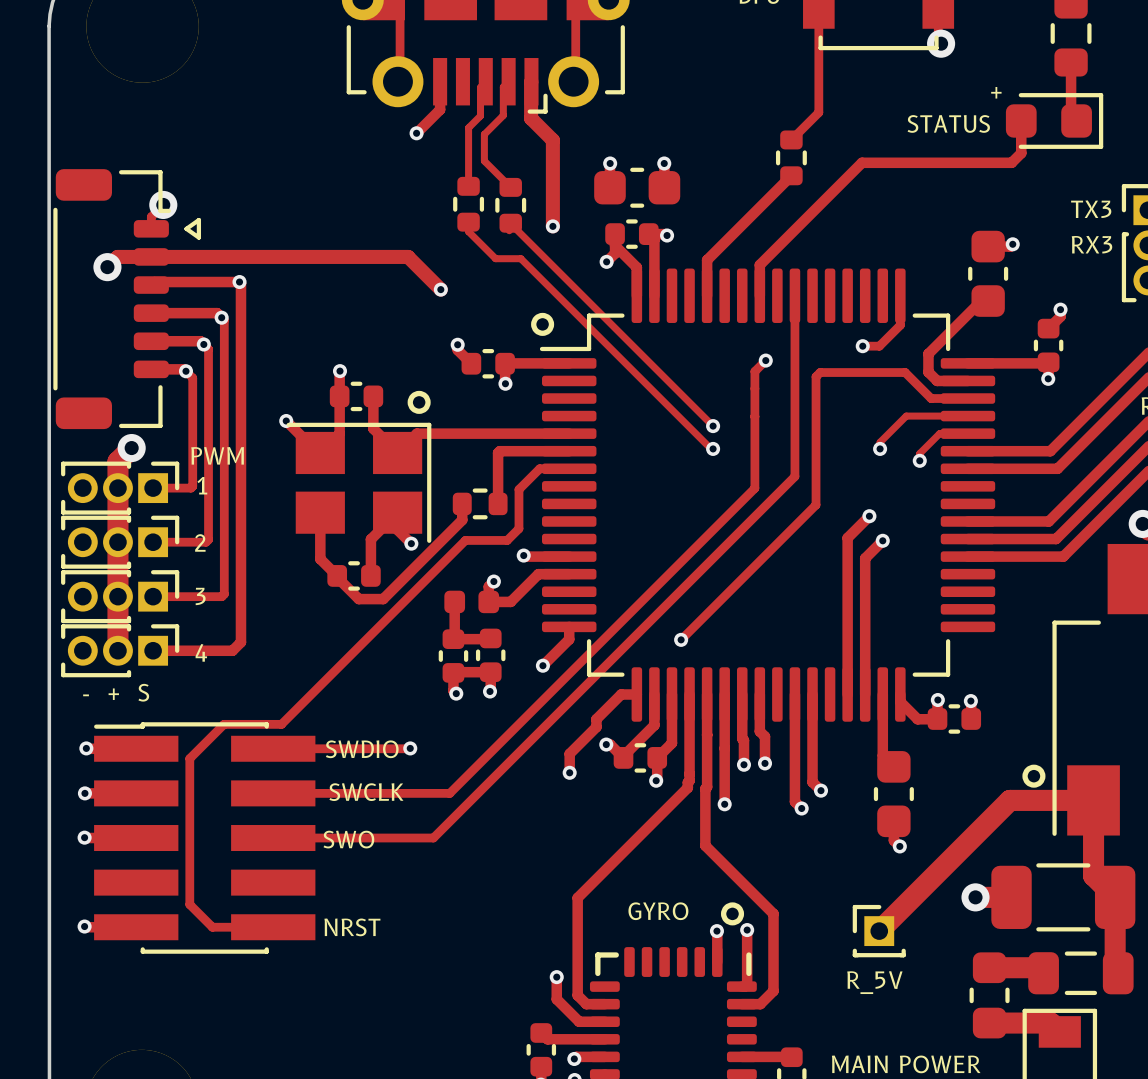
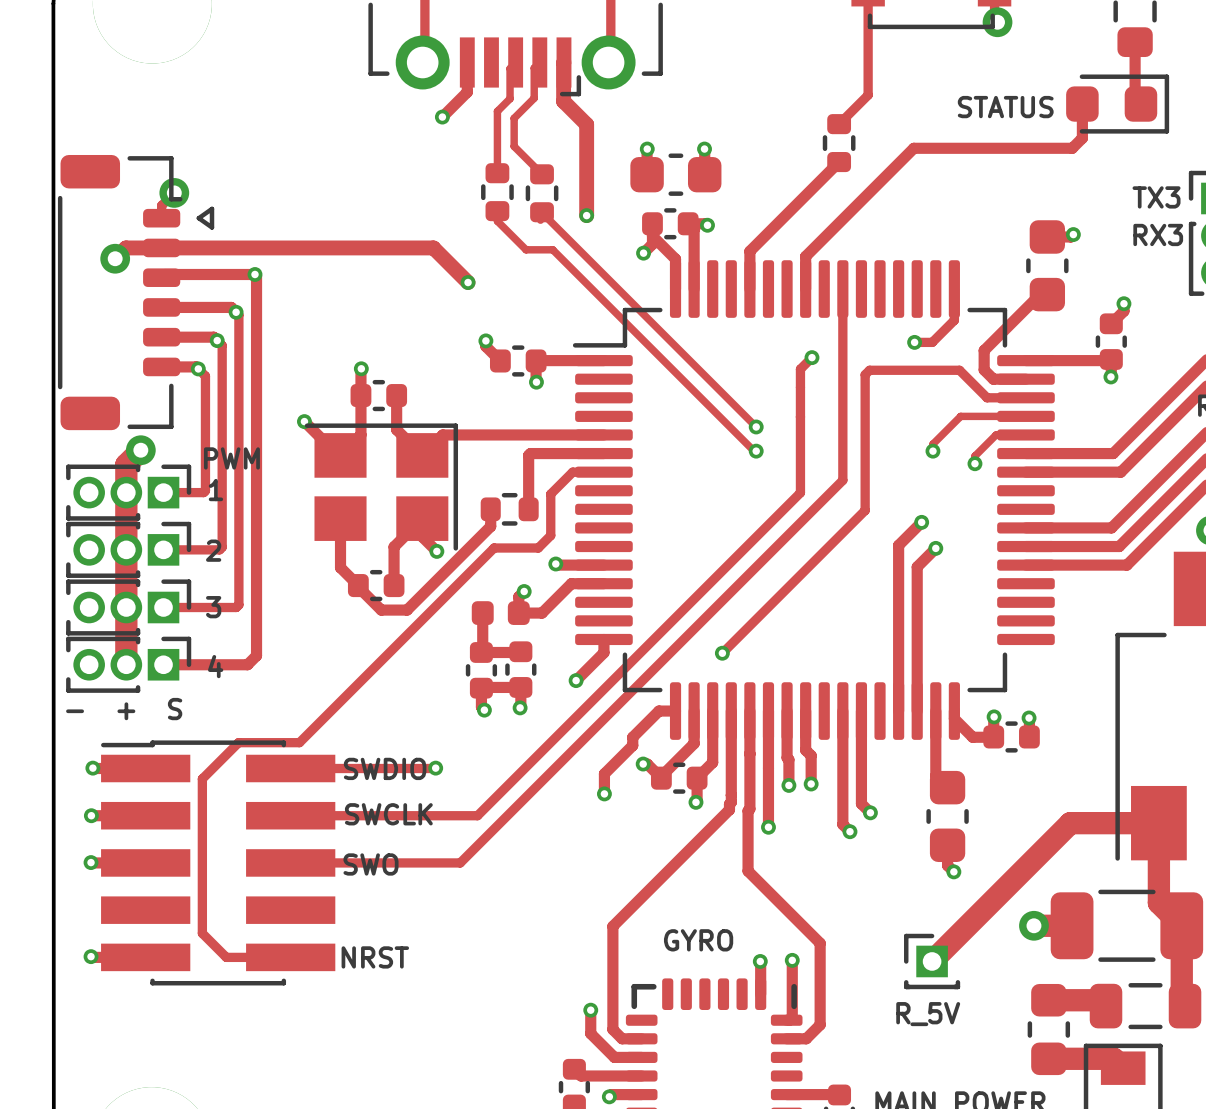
text: + (996, 92) -> none
drawing: [531, 312, 555, 336] -> none
drawing: [407, 390, 431, 414] -> none
drawing: [1022, 764, 1046, 788] -> none
drawing: [720, 902, 745, 926] -> none

